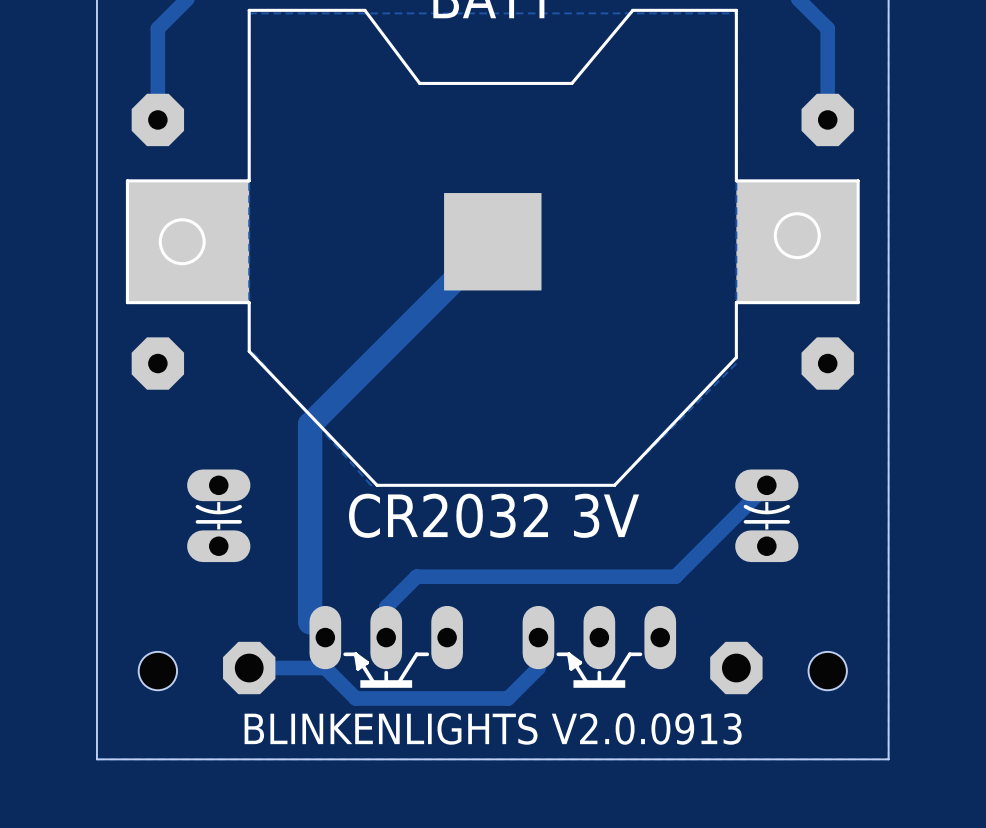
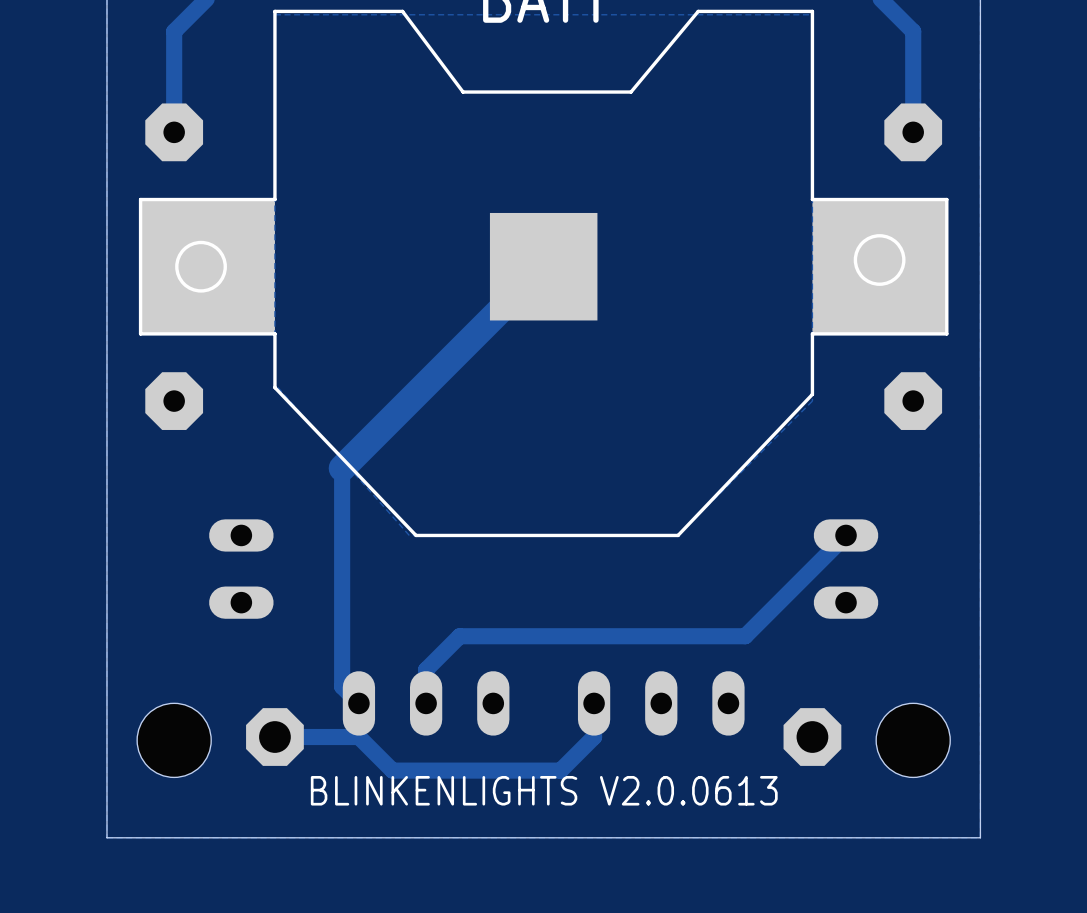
track width: thick (310, 424) (310, 622) -> thin (342, 468) (342, 686)
part footprint: [187, 469, 251, 563] -> [209, 519, 274, 619]
part footprint: [735, 469, 799, 563] -> [813, 519, 879, 619]
text: CR2032 3V (494, 515) -> none
part footprint: [309, 605, 463, 688] -> [342, 671, 510, 736]
part footprint: [522, 605, 677, 688] -> [577, 671, 745, 736]
hole size: [138, 651, 178, 691] -> [137, 703, 212, 778]
hole size: [808, 651, 847, 691] -> [876, 703, 951, 778]
text: BLINKENLIGHTS V2.0.0913 (493, 728) -> BLINKENLIGHTS V2.0.0613 (544, 790)

